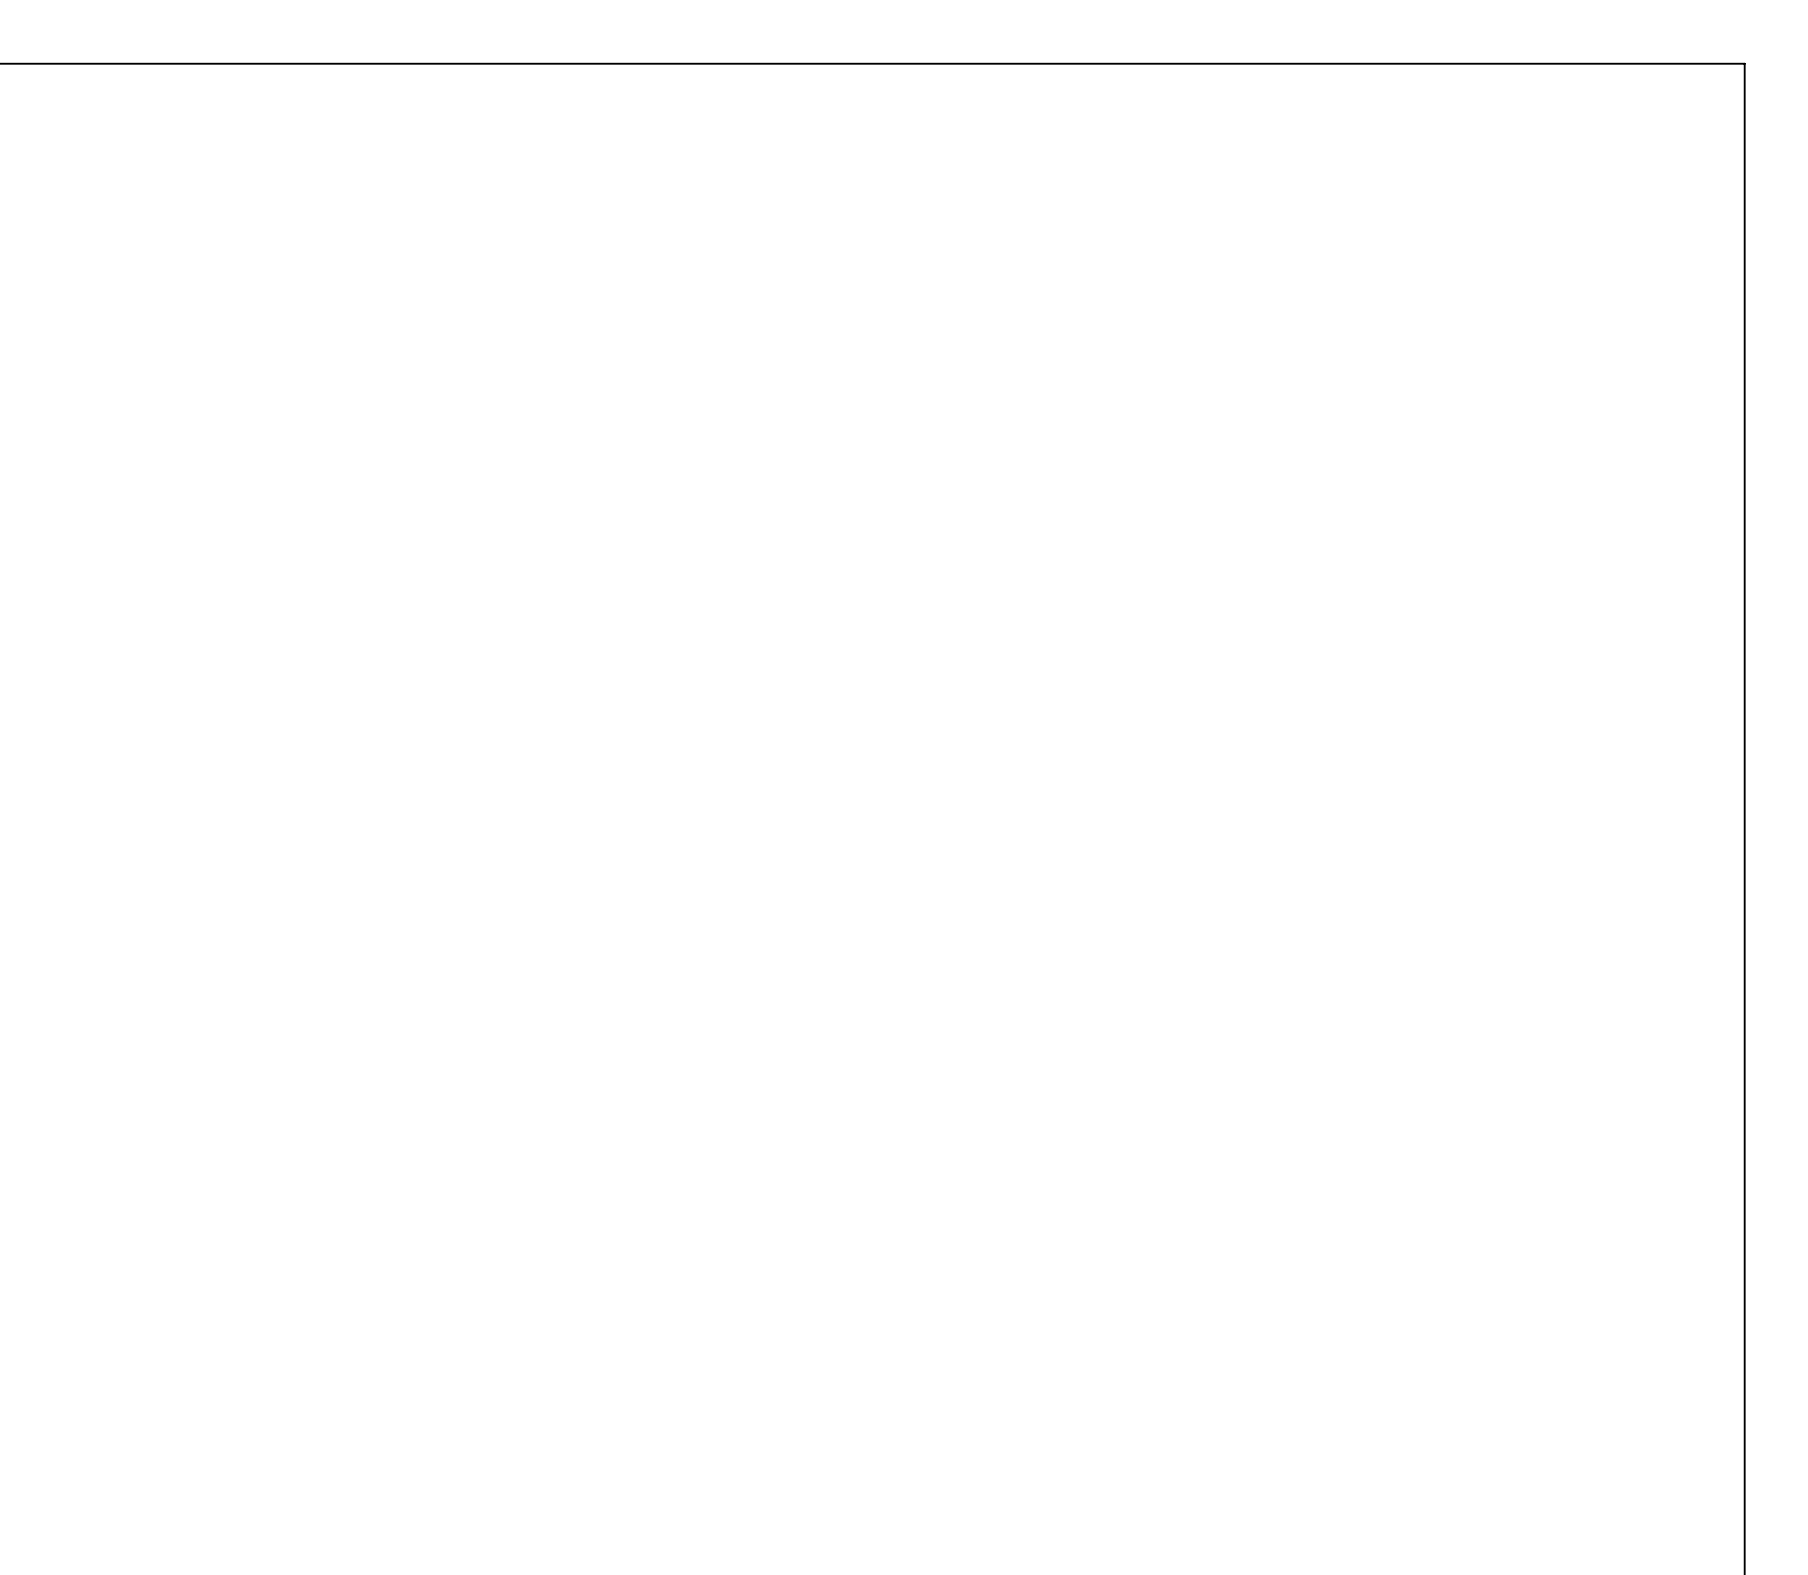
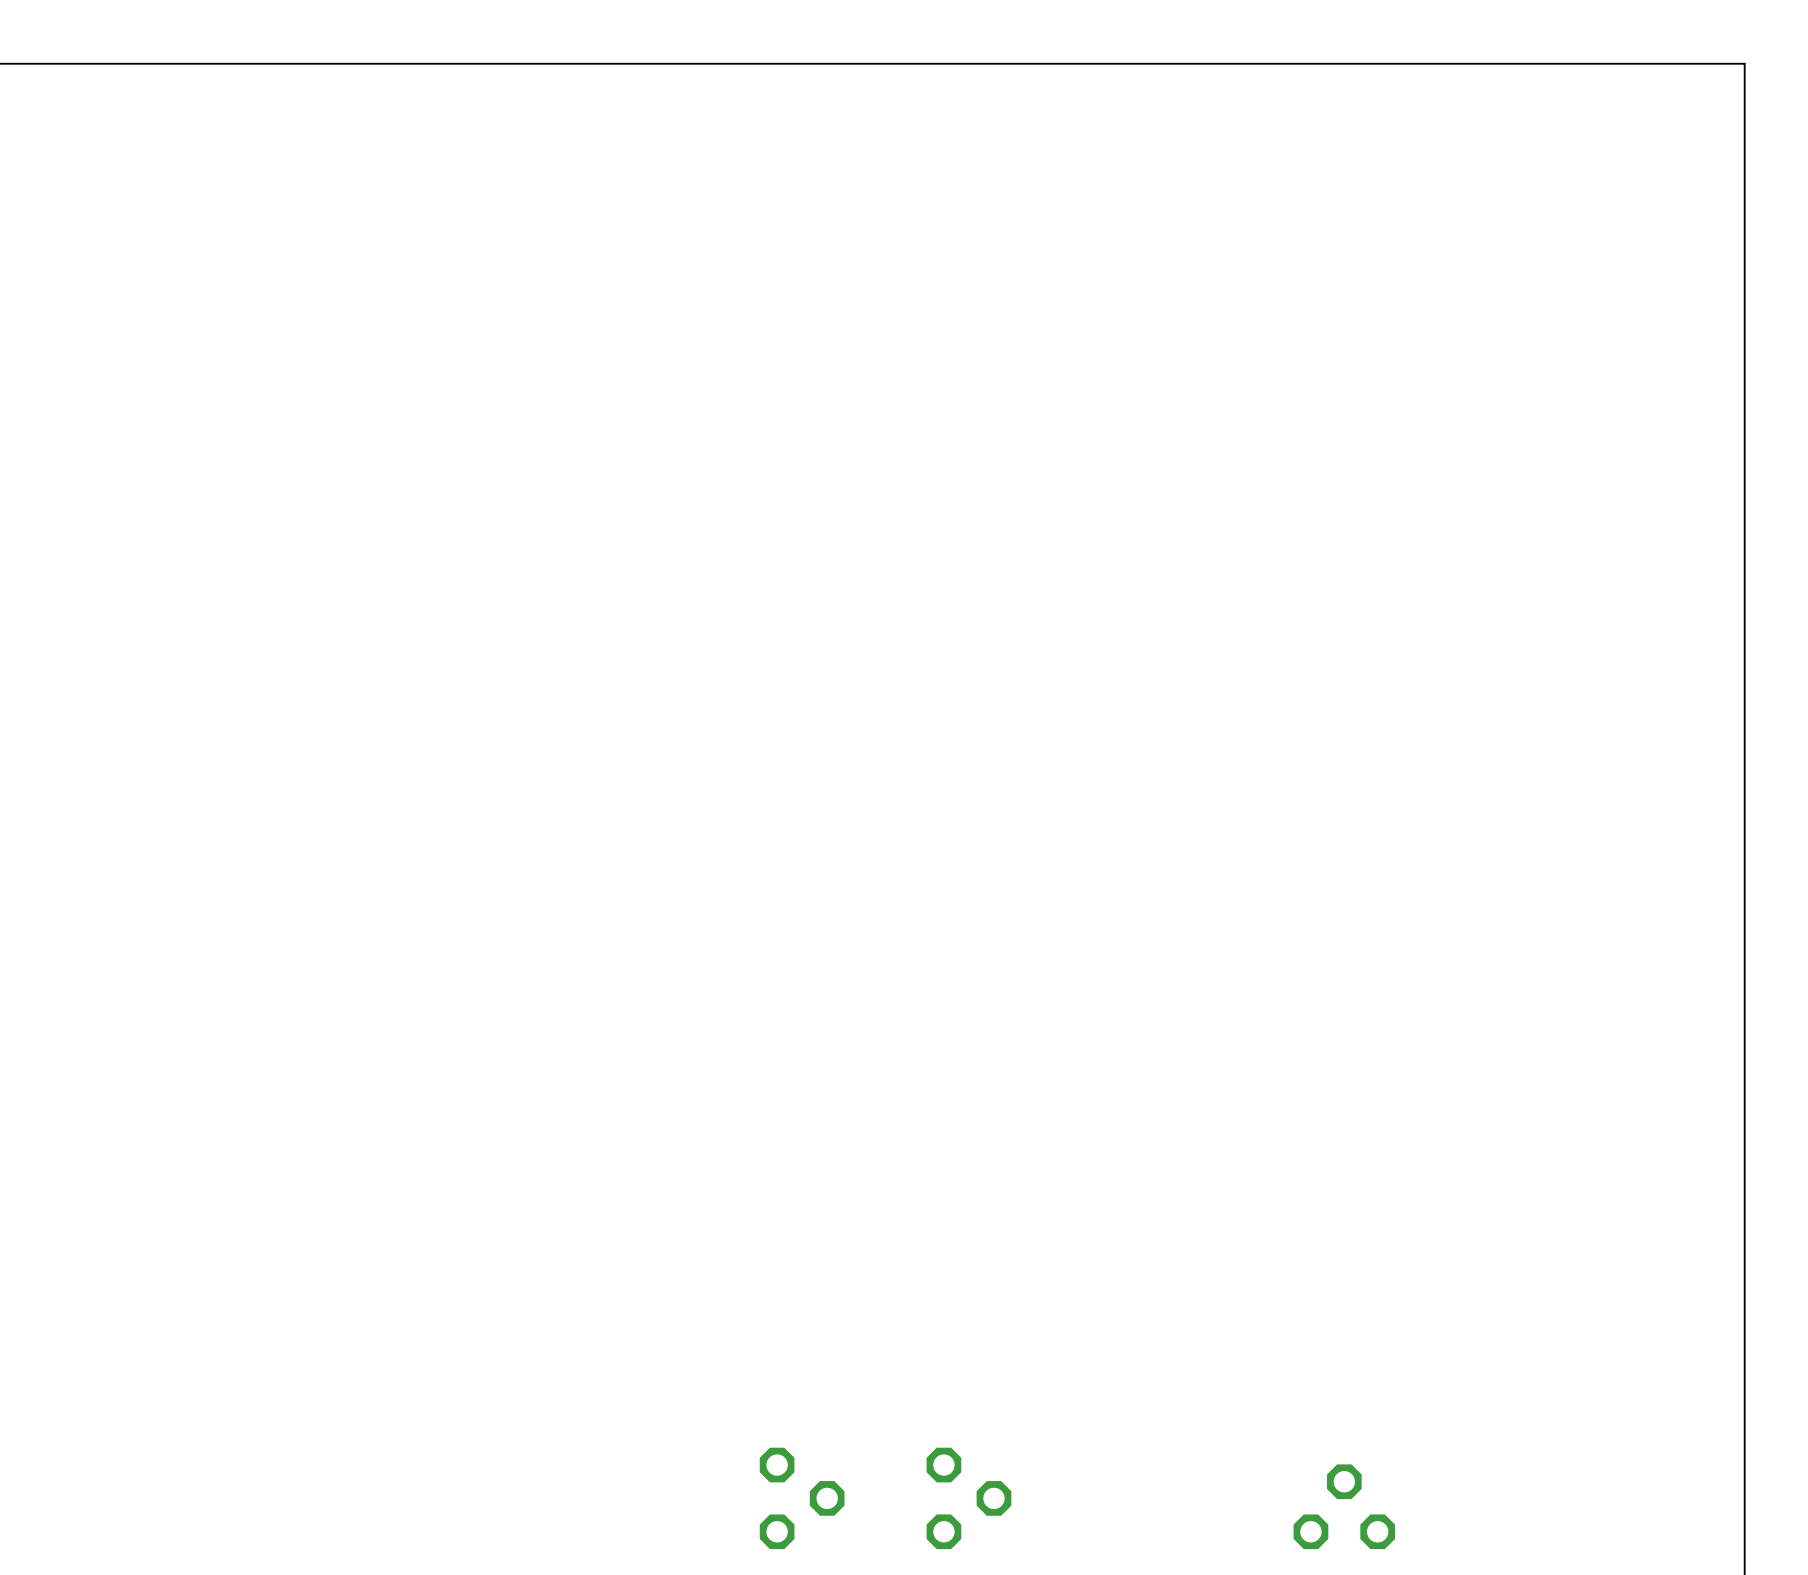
part: none -> (802, 1498)
part: none -> (968, 1498)
part: none -> (1344, 1506)

